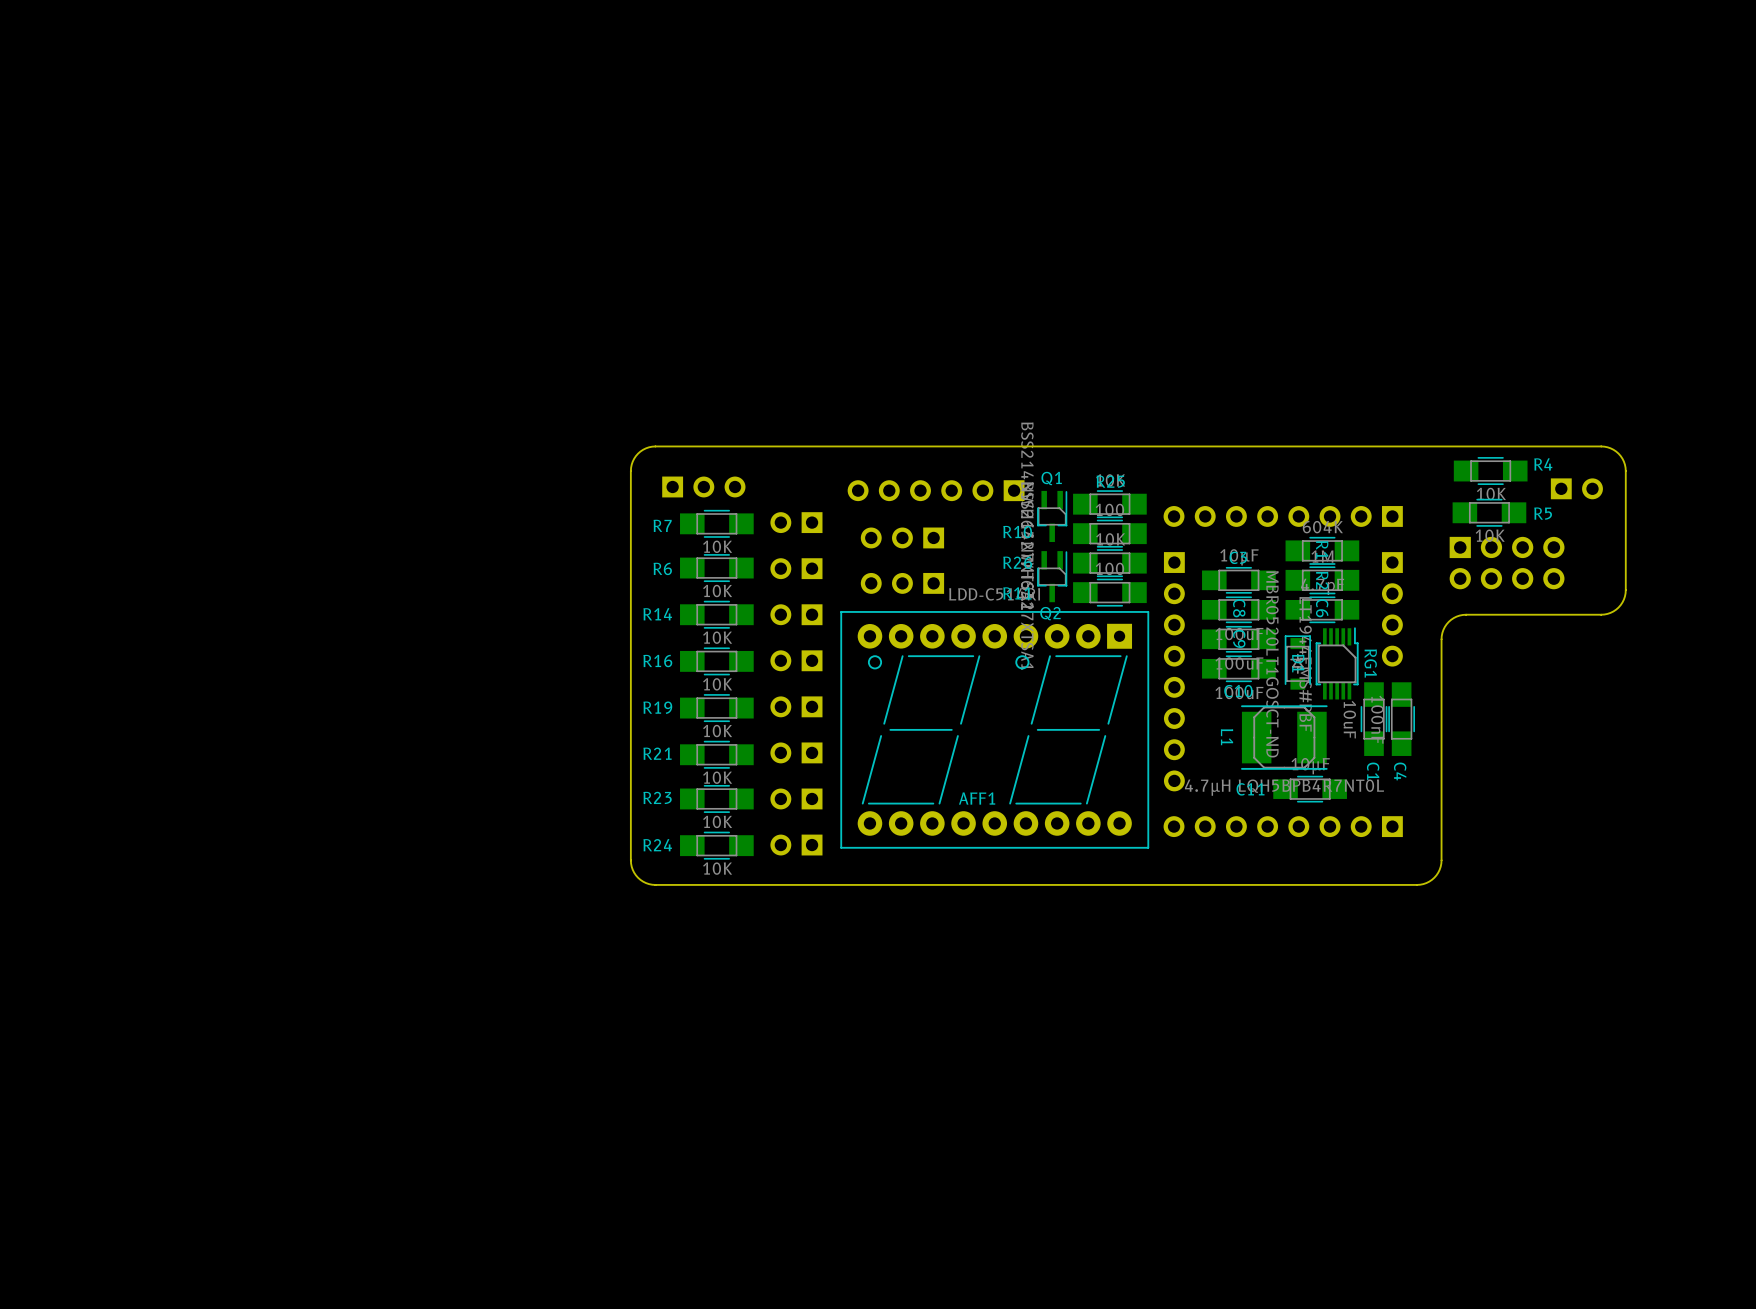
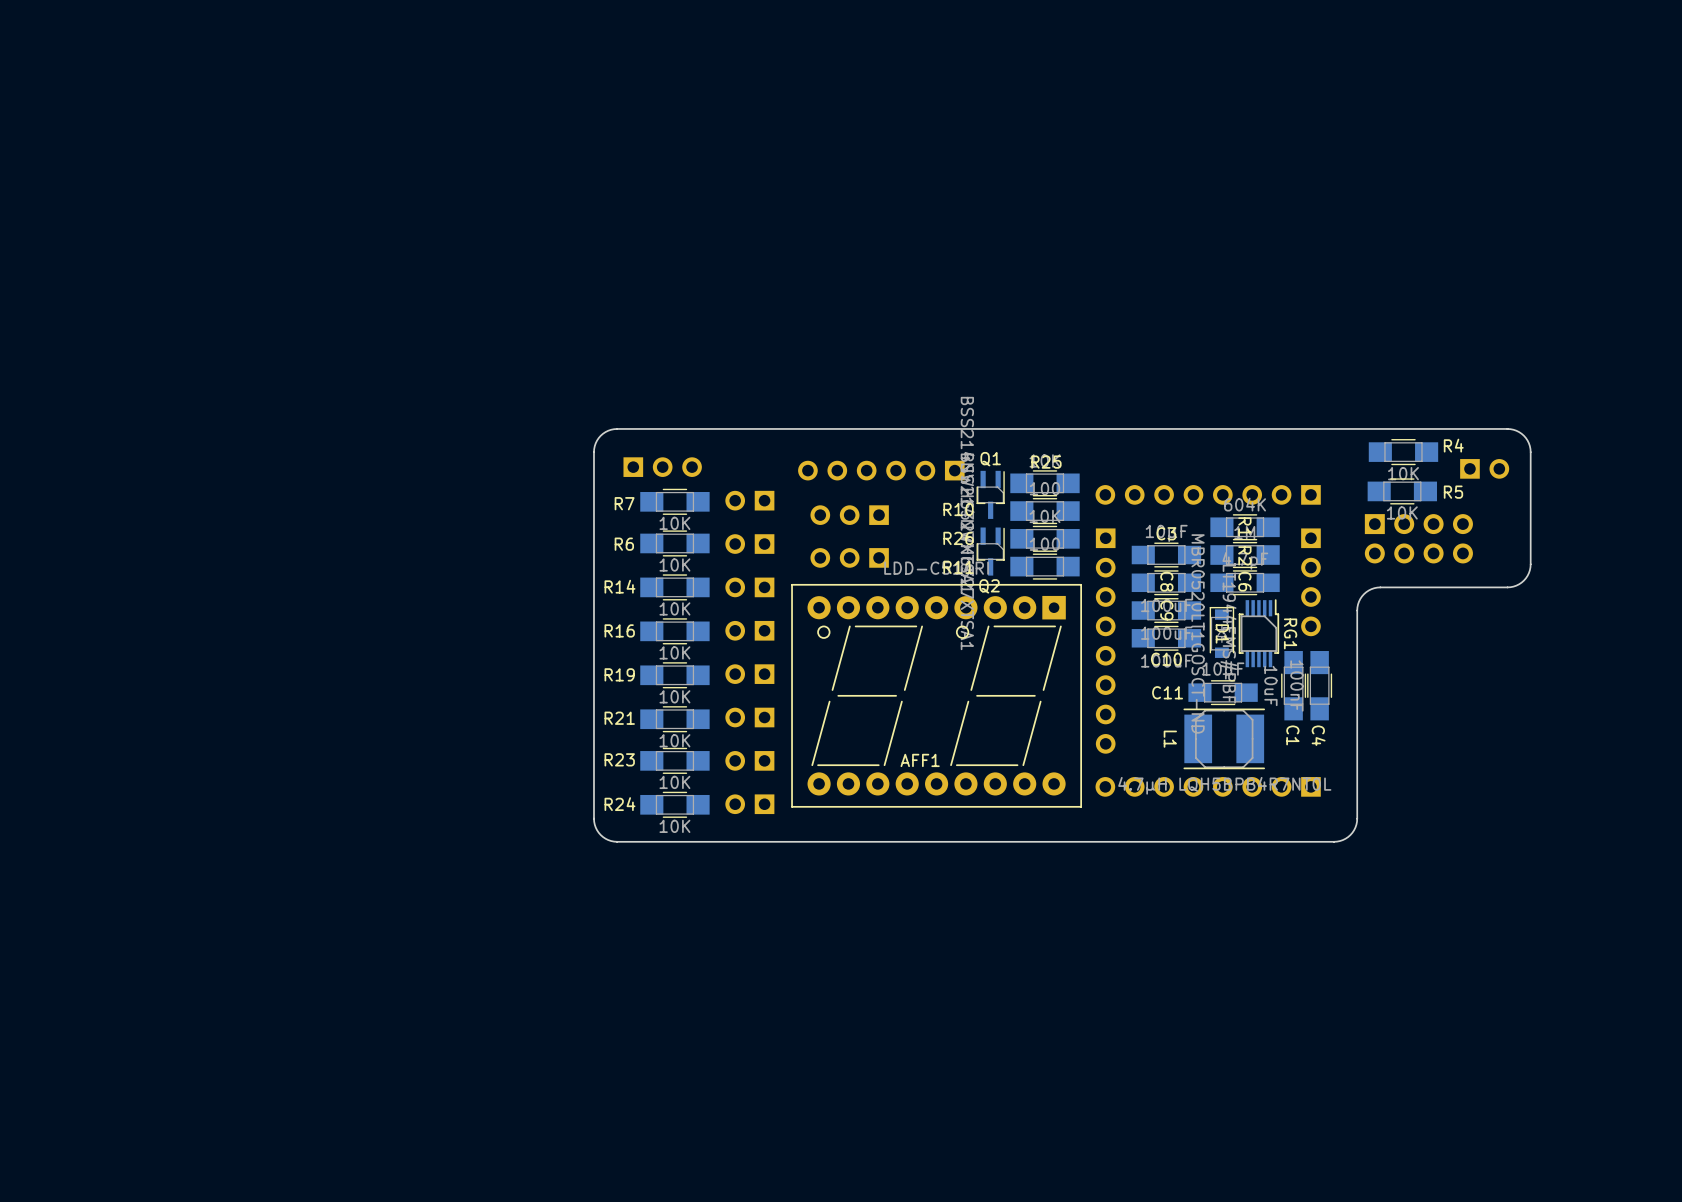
L1 position: (1284, 737) -> (1224, 738)
C11 position: (1310, 789) -> (1223, 692)

